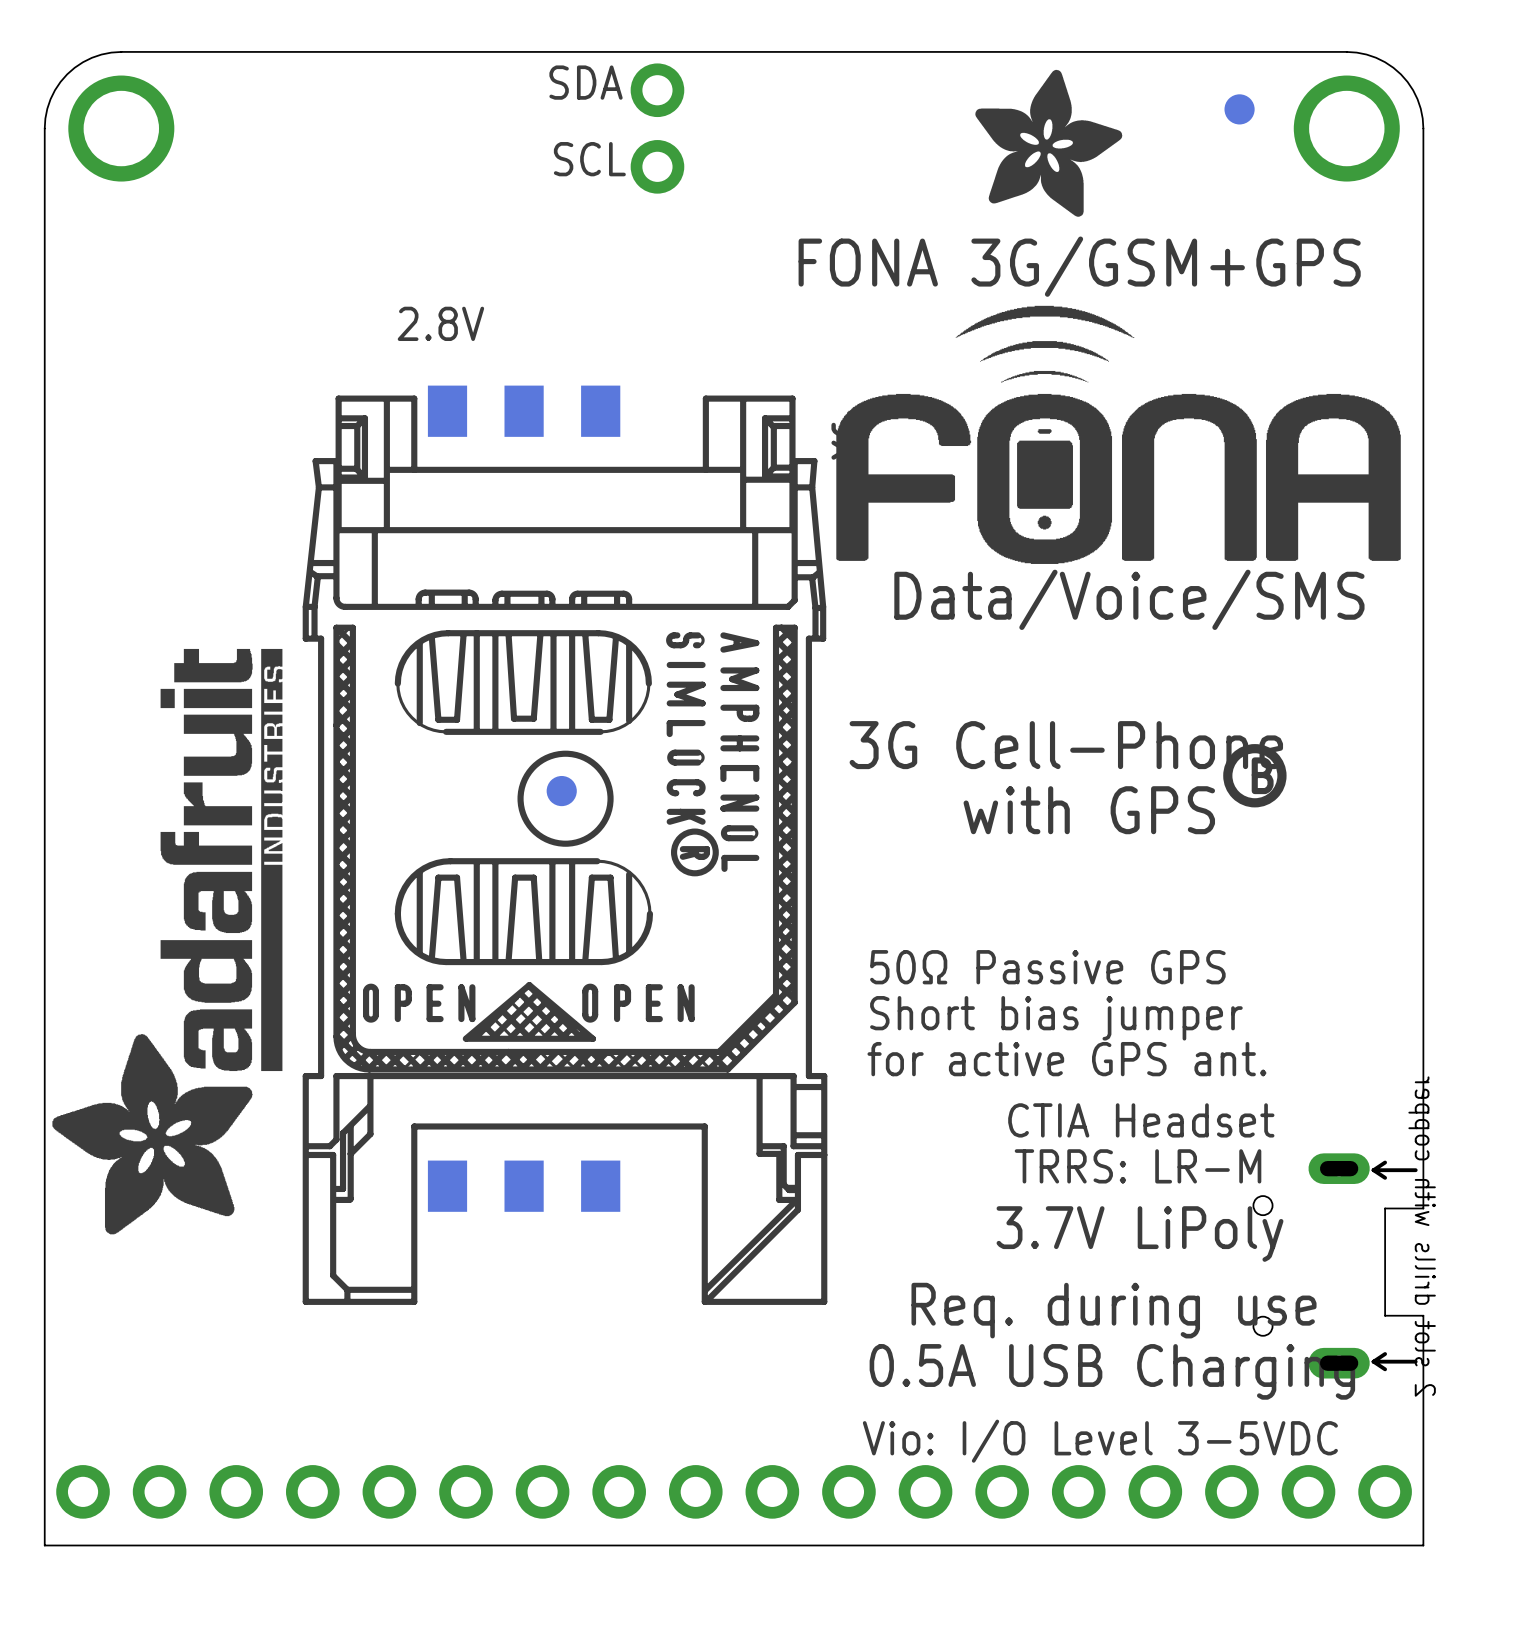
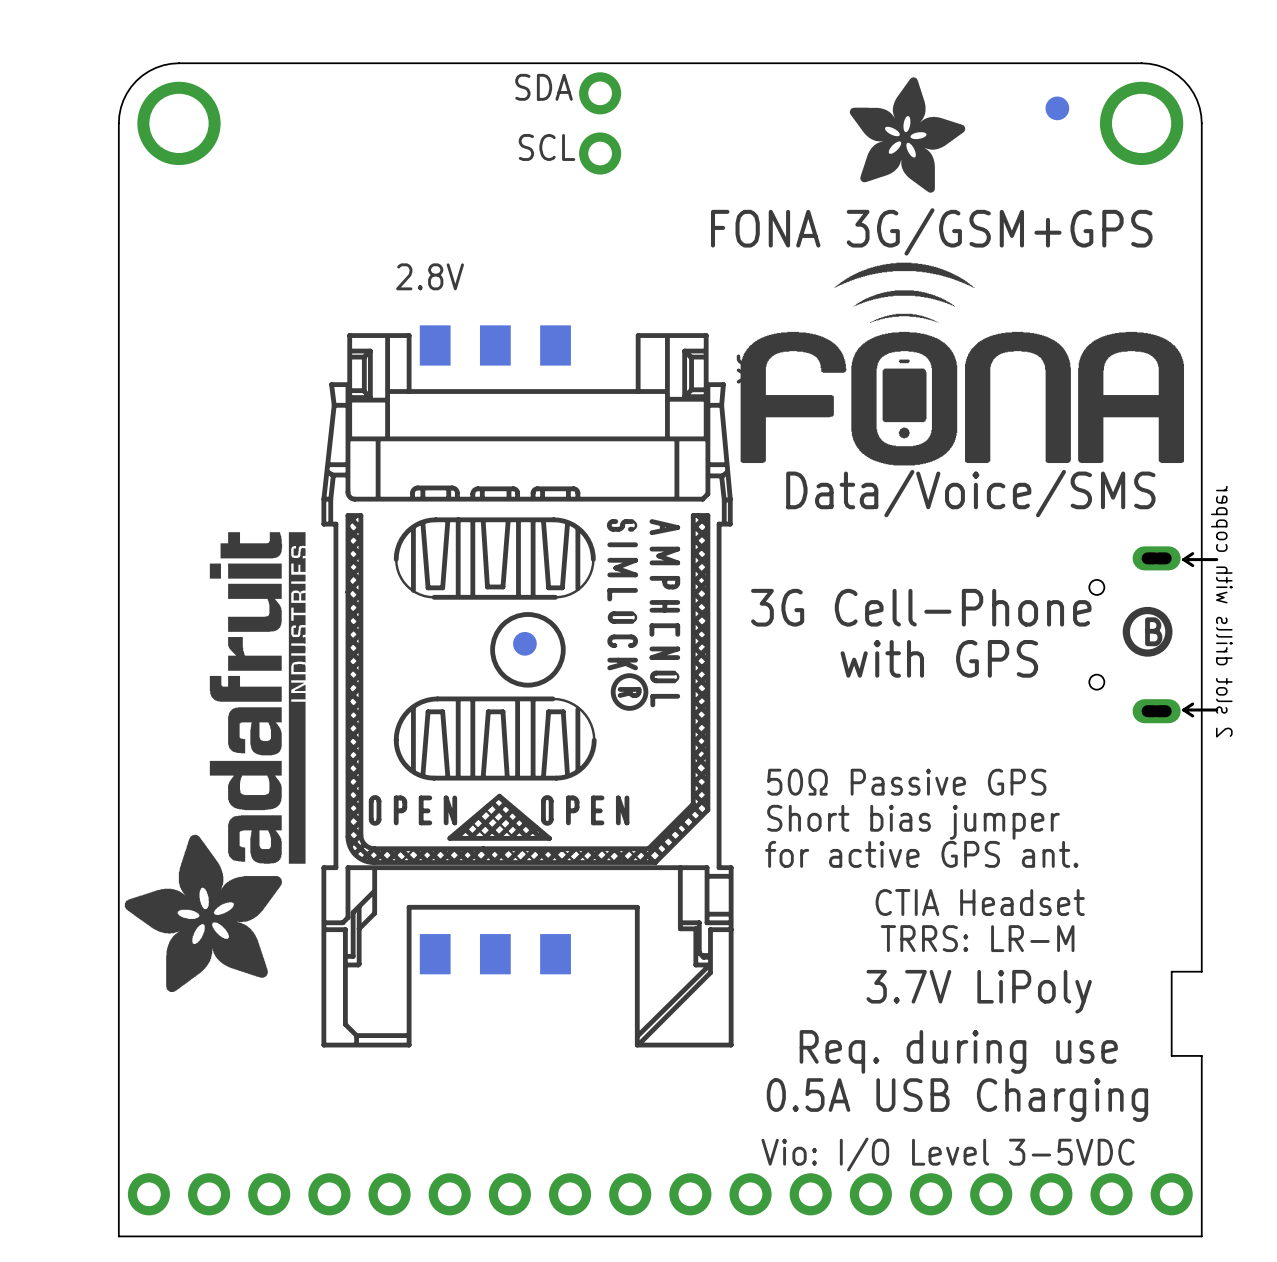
drawing position: (1254, 775) -> (1147, 631)
part position: (1335, 1265) -> (1153, 634)

